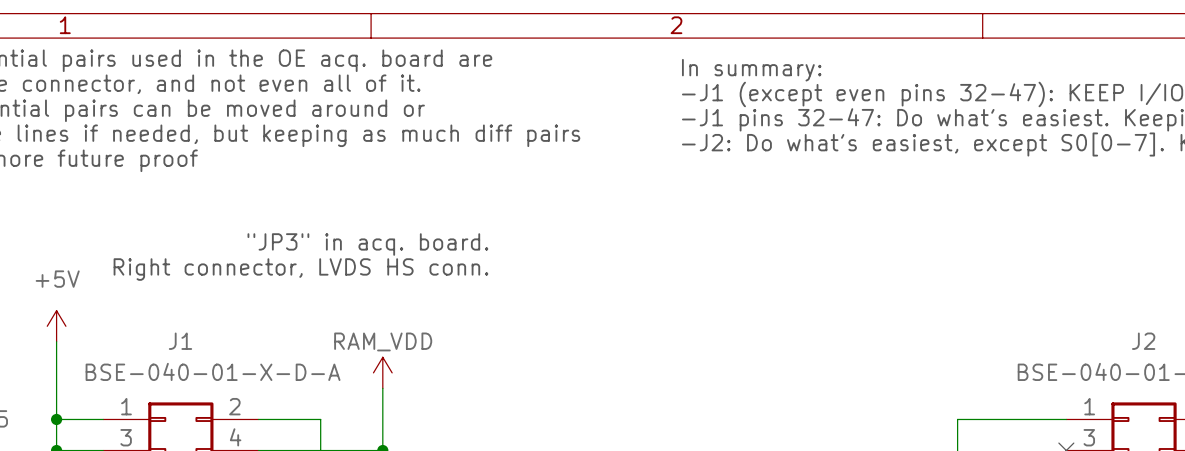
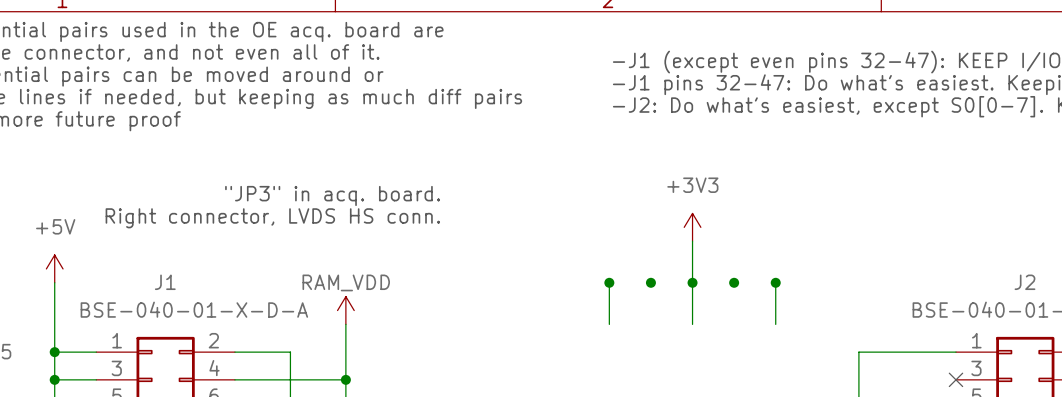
text: In summary: (751, 70) -> none
power symbol: none -> +3V3 (692, 227)
wire: none -> (692, 241) (692, 324)
wire: none -> (609, 282) (609, 324)
junction: none -> (609, 282)
junction: none -> (650, 282)
junction: none -> (692, 282)
junction: none -> (734, 282)
wire: none -> (775, 282) (775, 324)
junction: none -> (775, 282)

